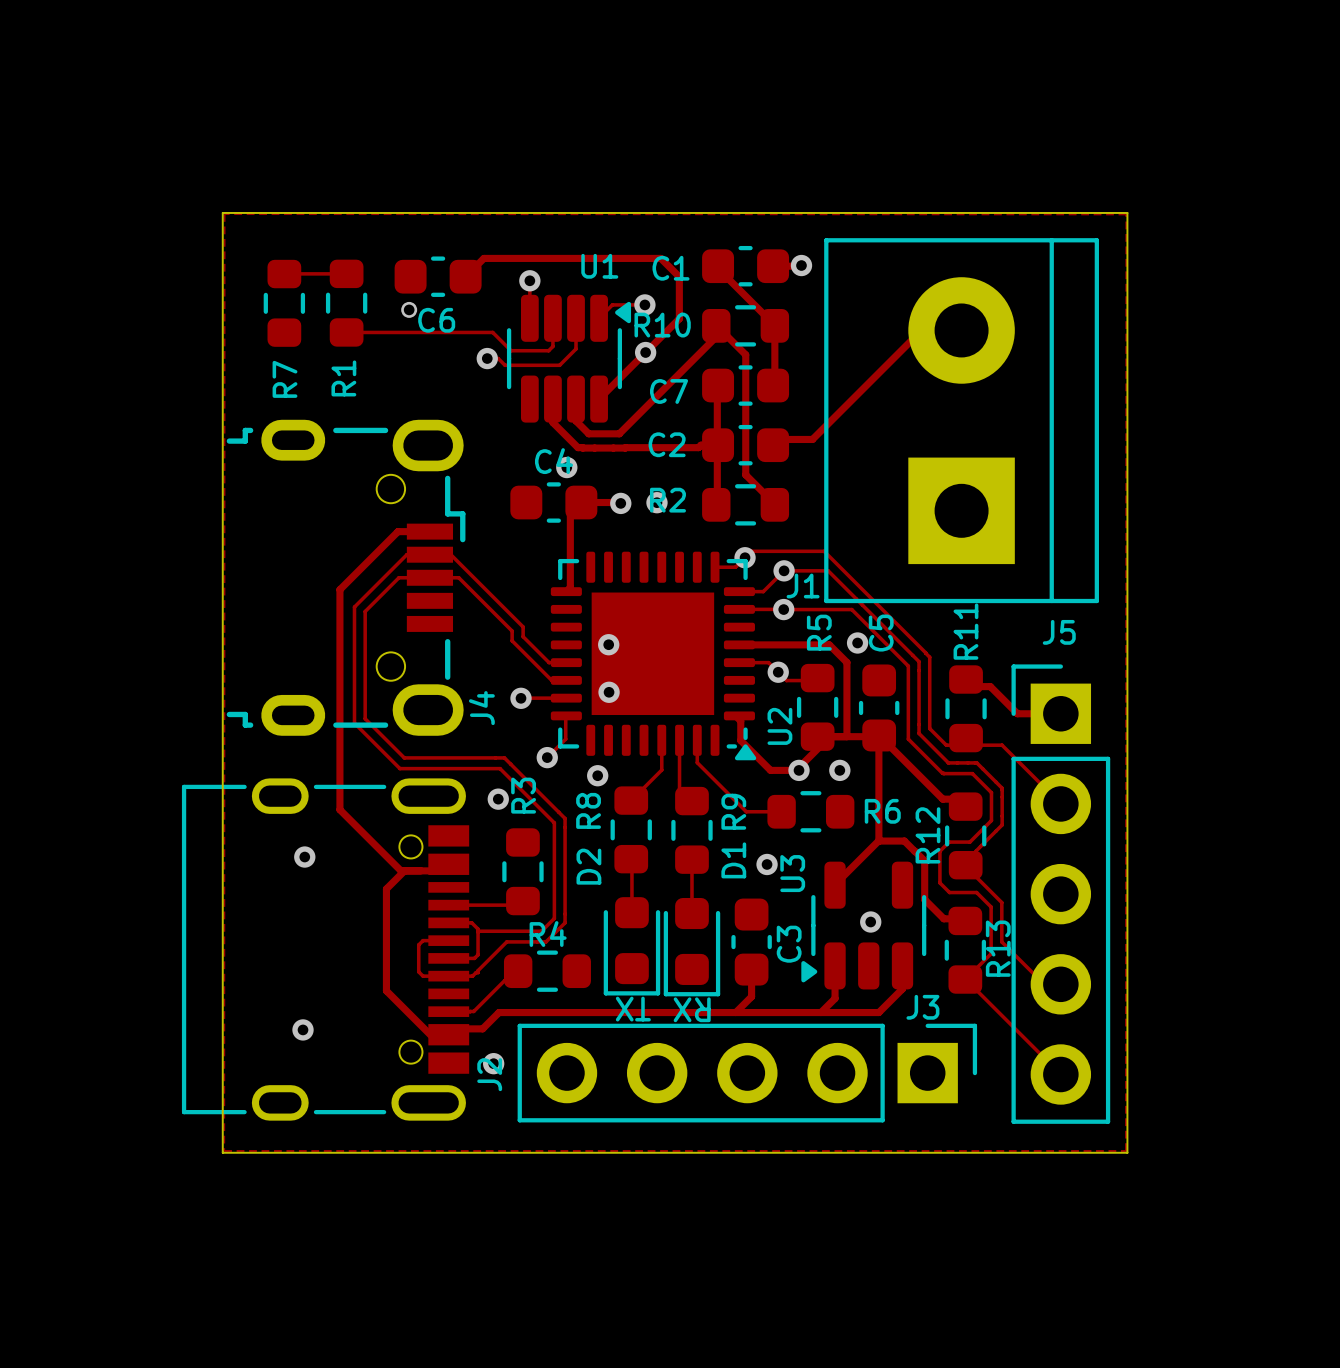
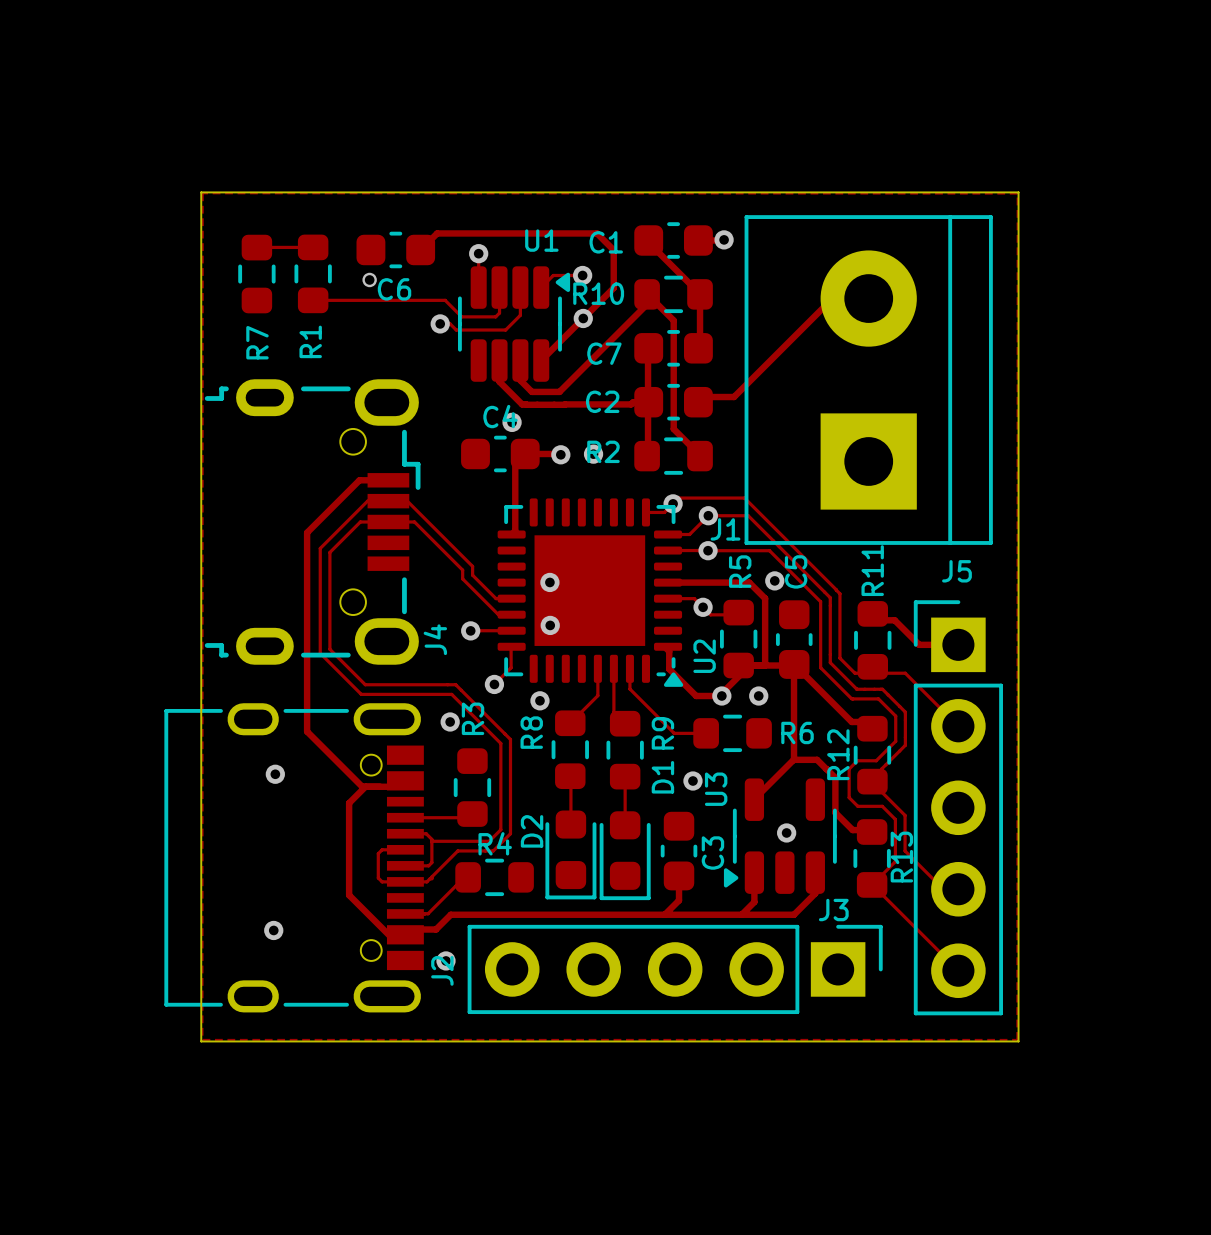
D2 name position: D2 (588, 866) -> D2 (532, 831)
text: TX (633, 1009) -> none
text: RX (692, 1009) -> none

